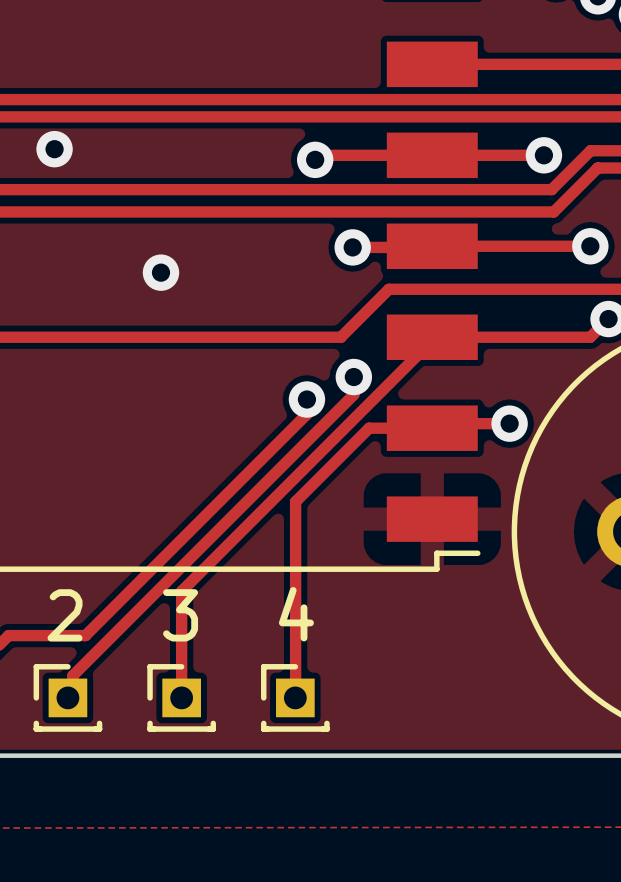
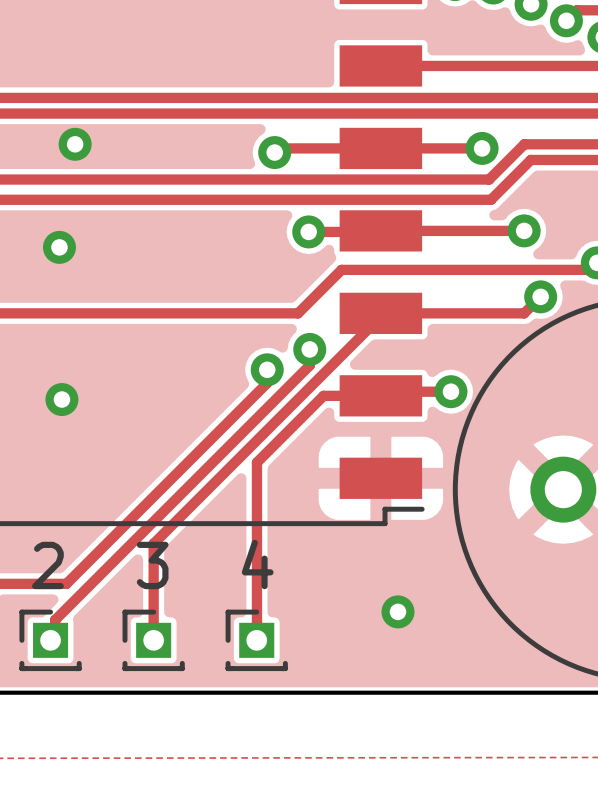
via position: (54, 149) -> (75, 144)
via: none -> (59, 247)
via: (161, 272) -> none
via: none -> (61, 399)
via: none -> (397, 611)

